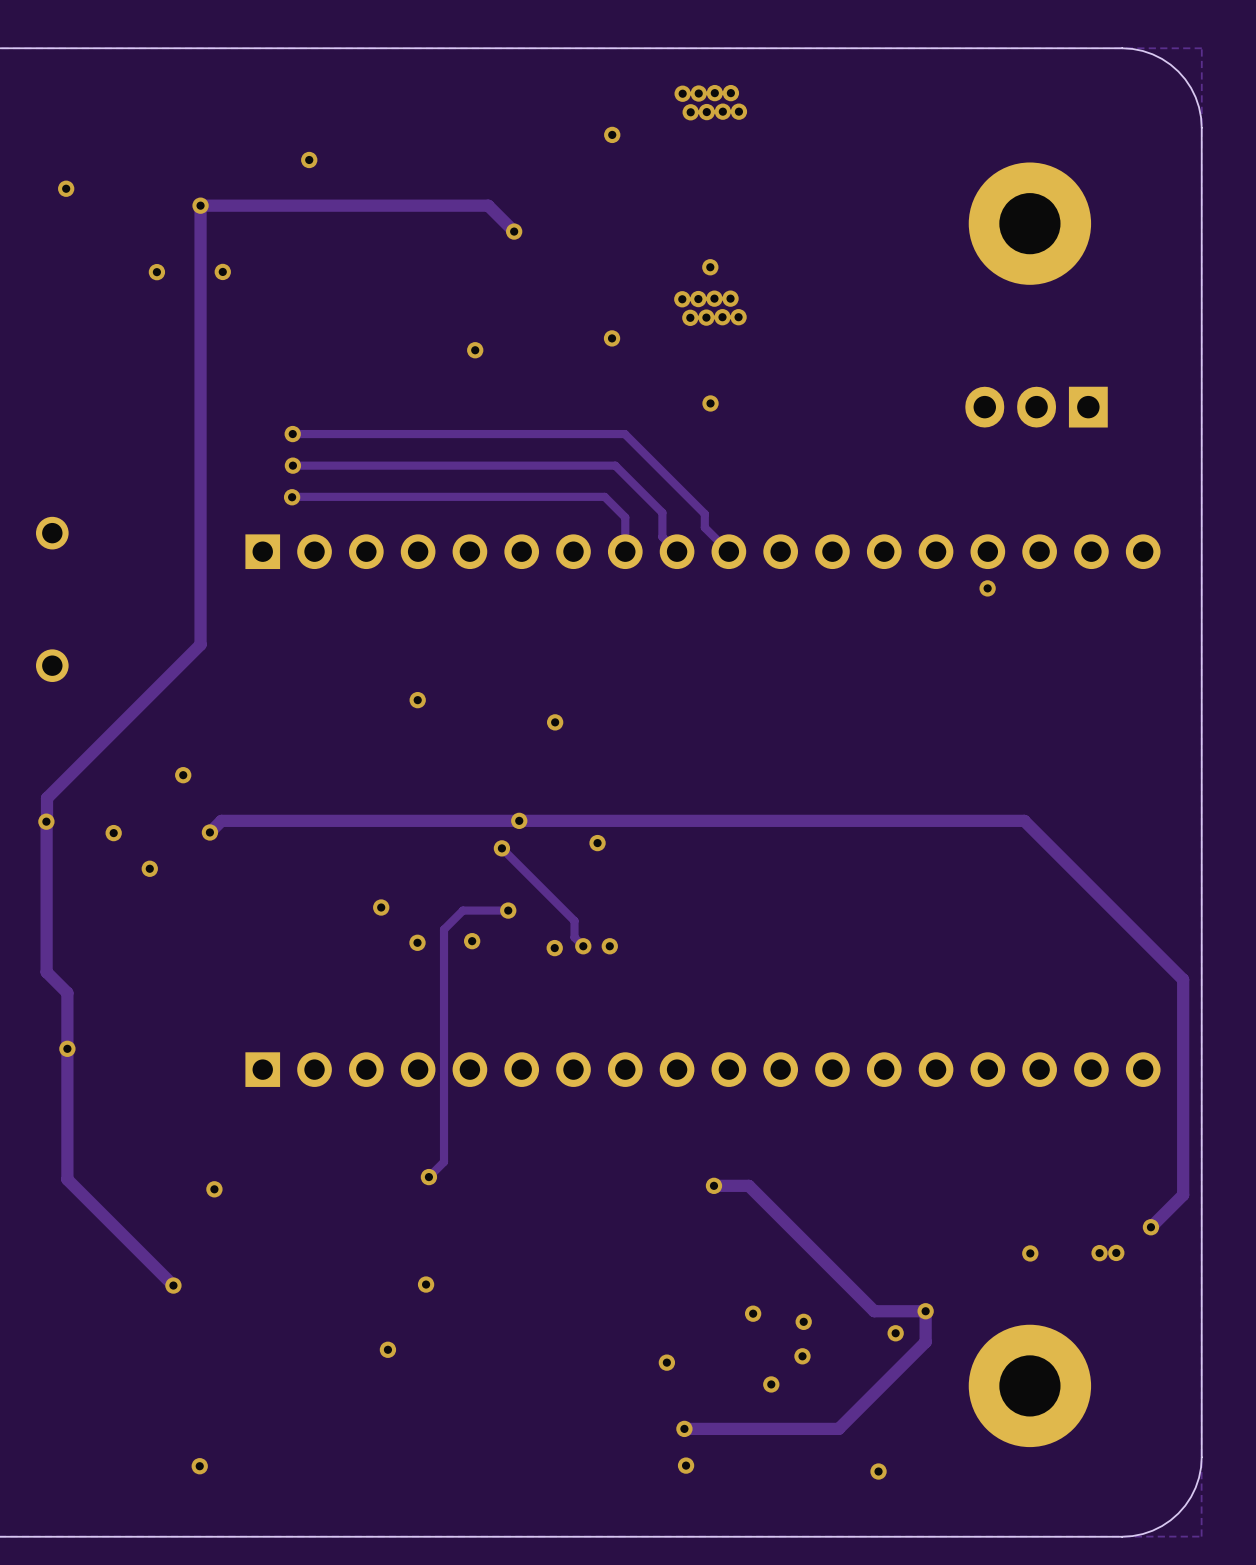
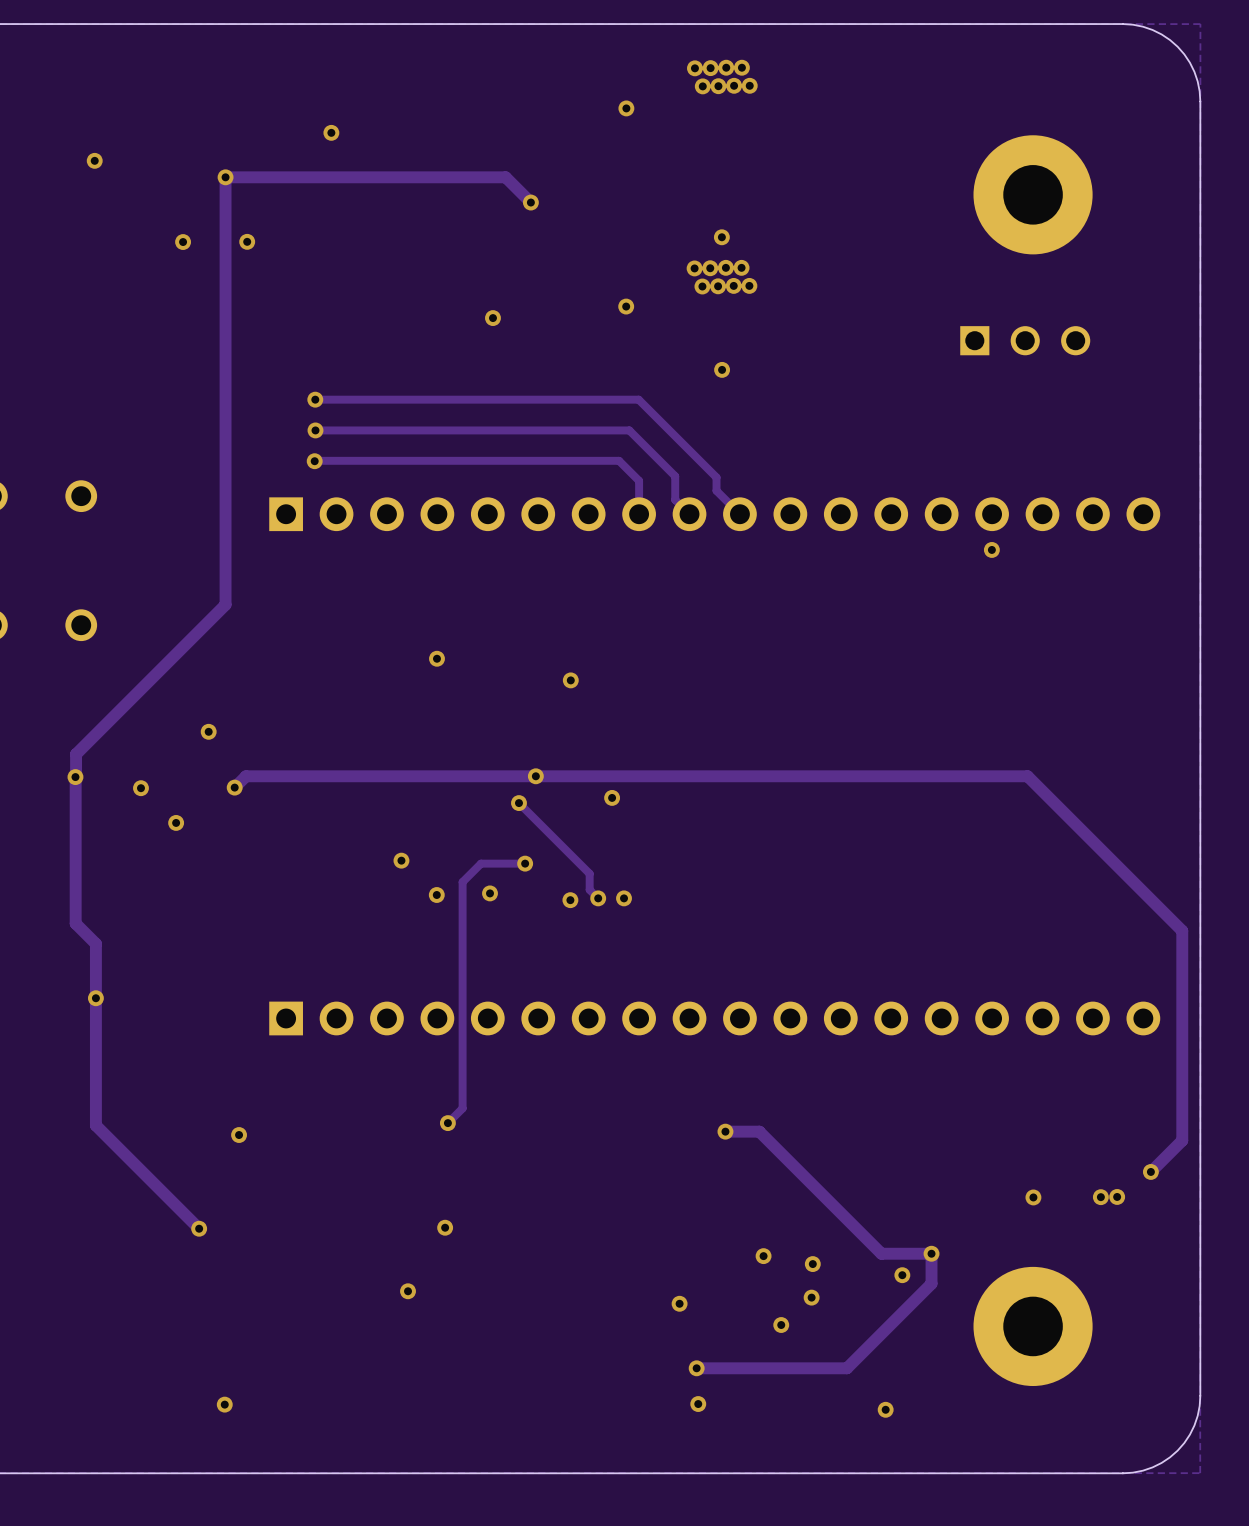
part: none -> (1025, 340)
part: (1036, 407) -> none

